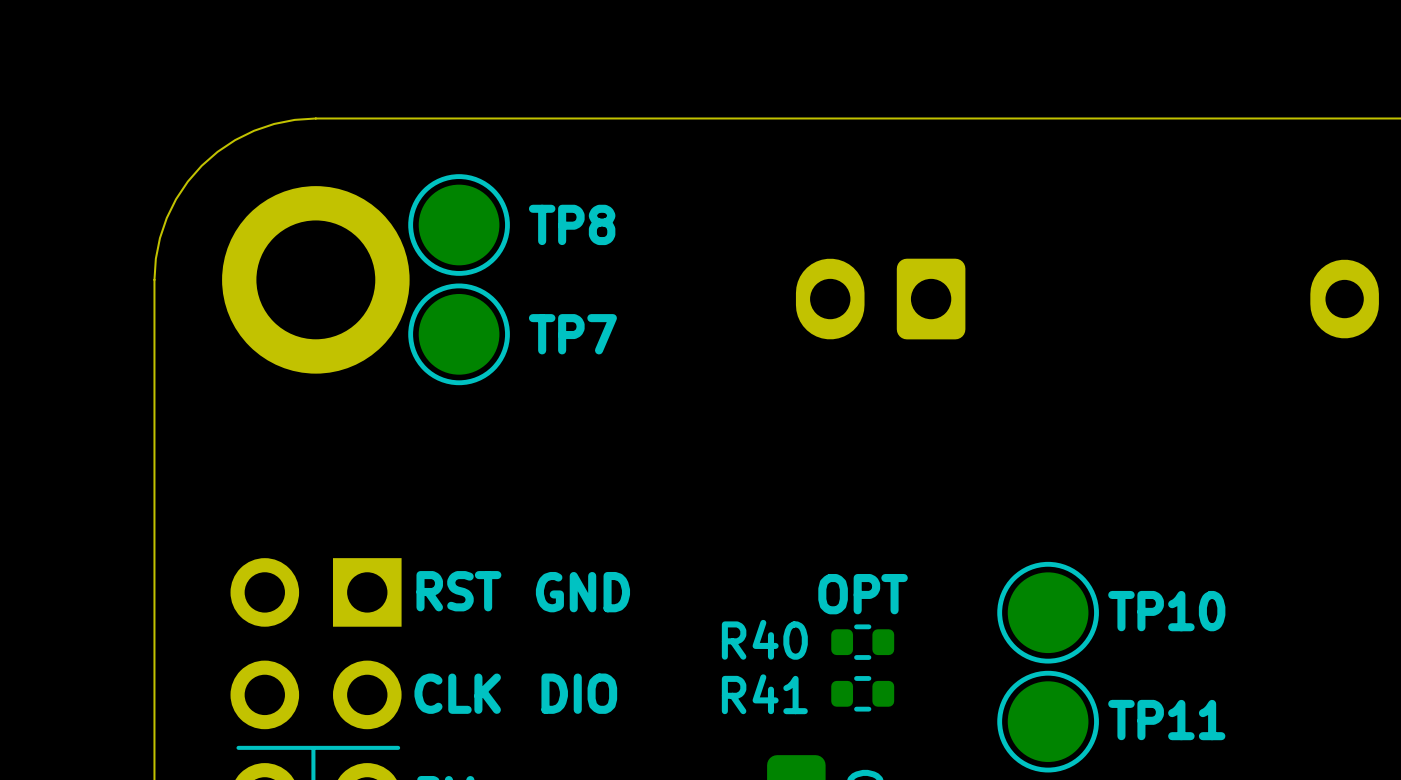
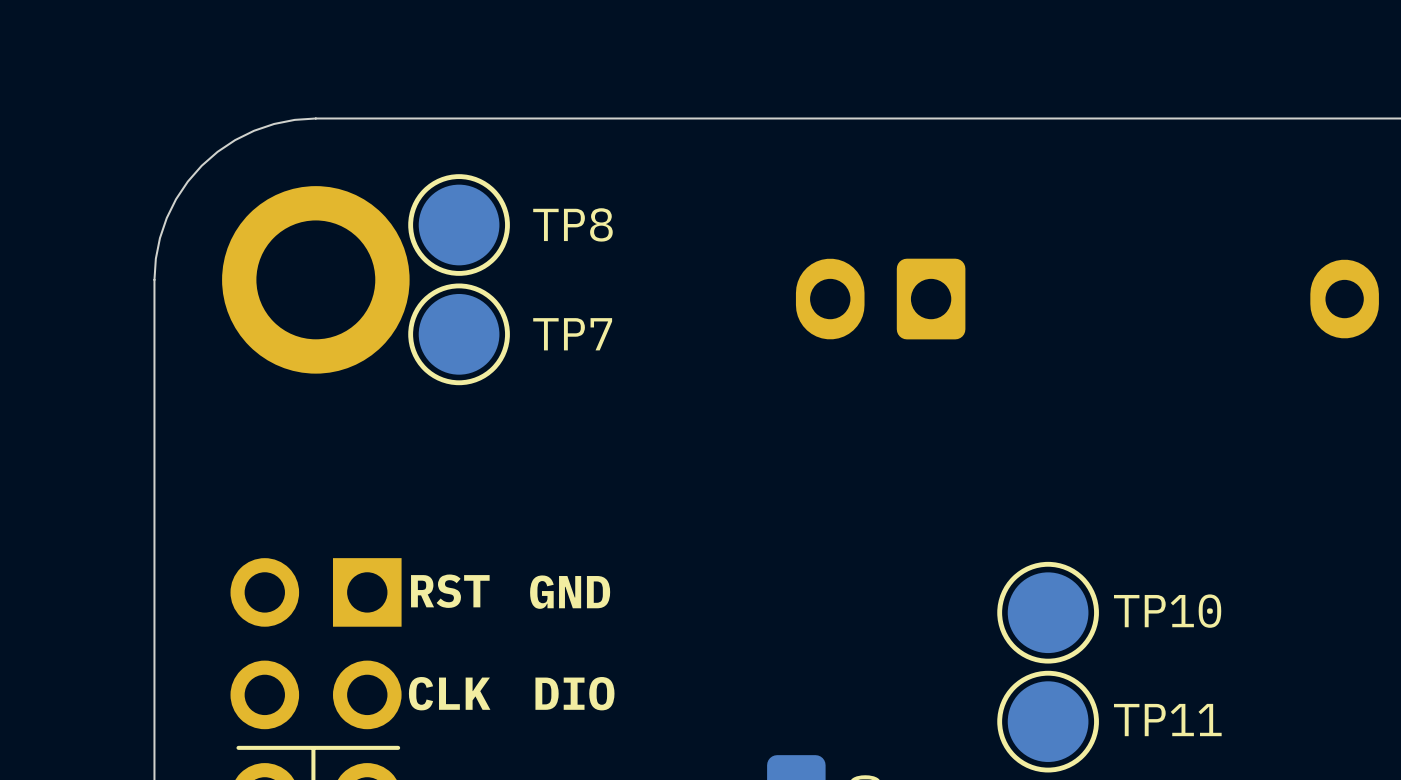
text: OPT (863, 594) -> none
R40: (862, 642) -> none
R41: (862, 693) -> none

